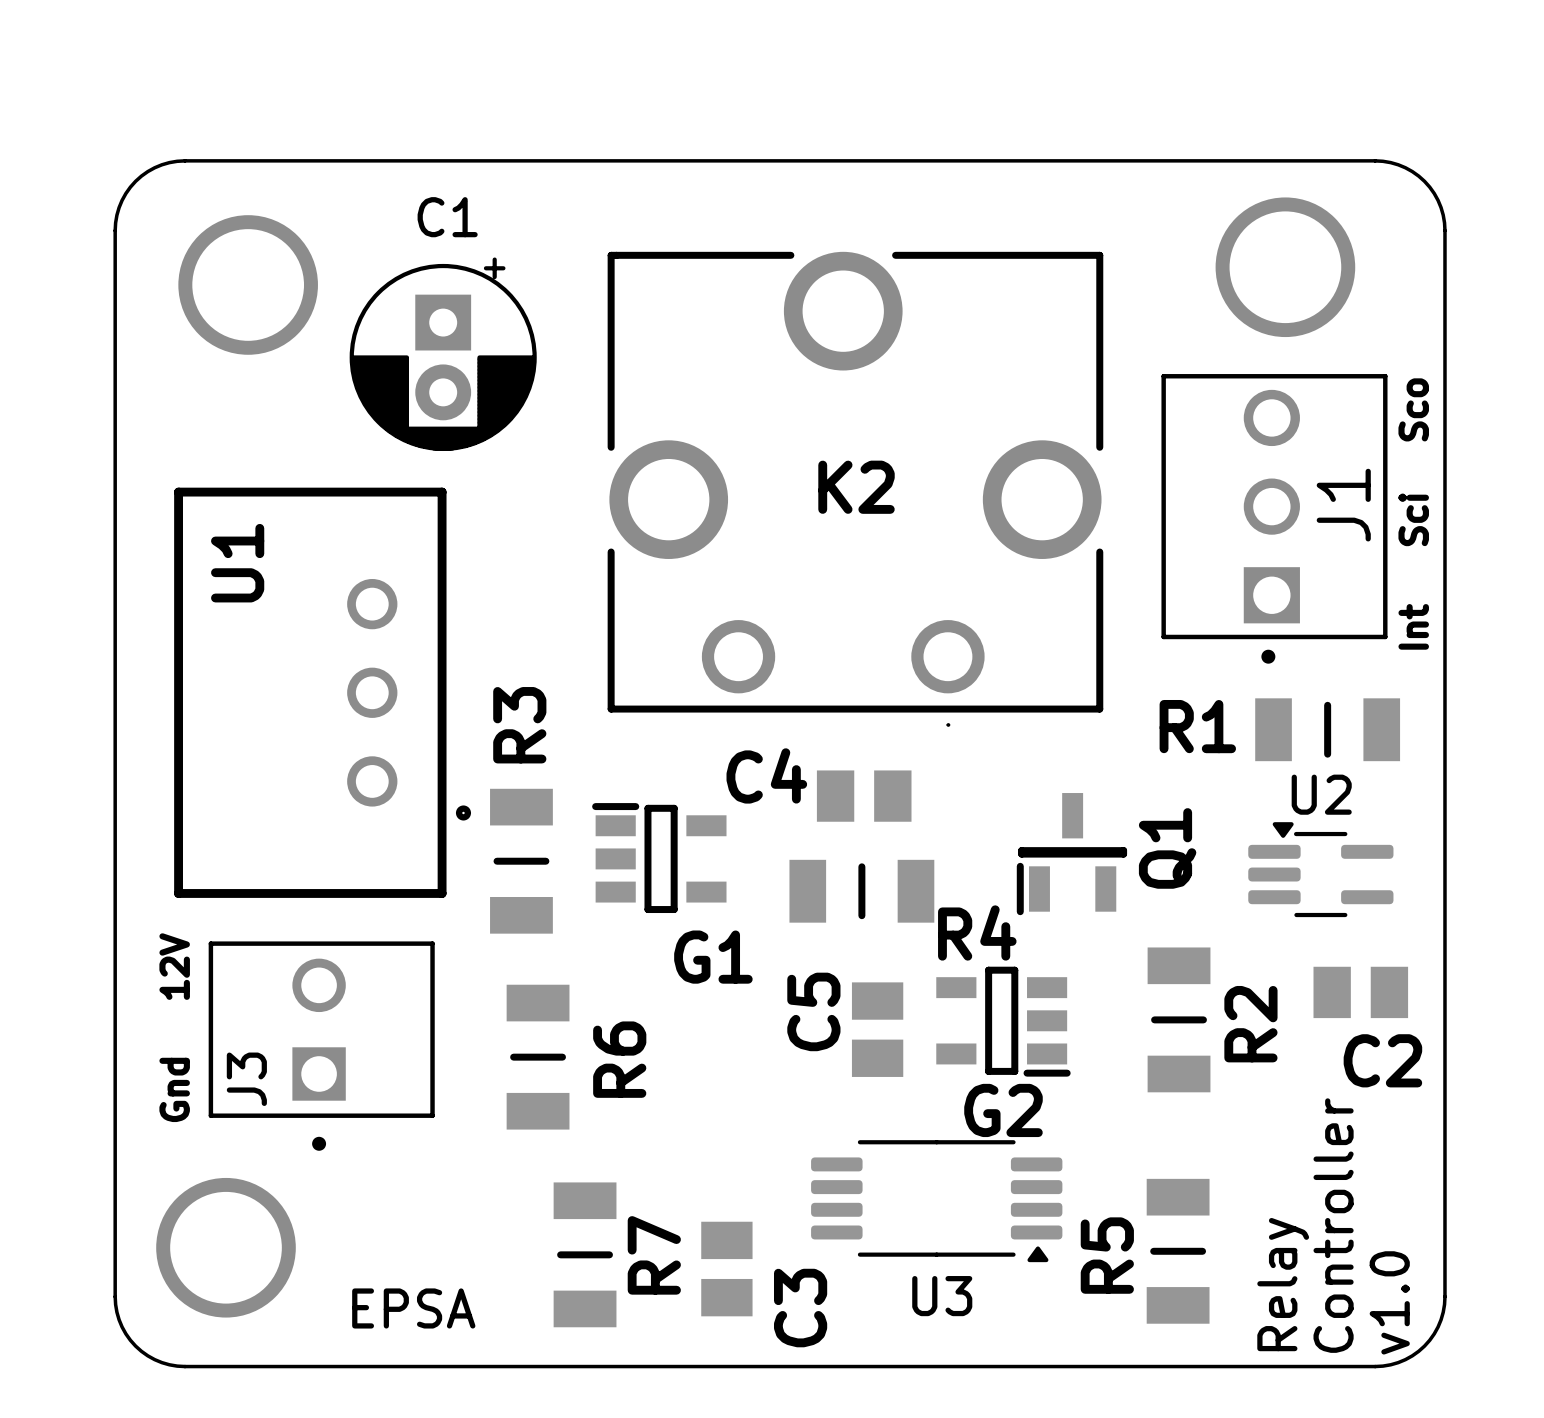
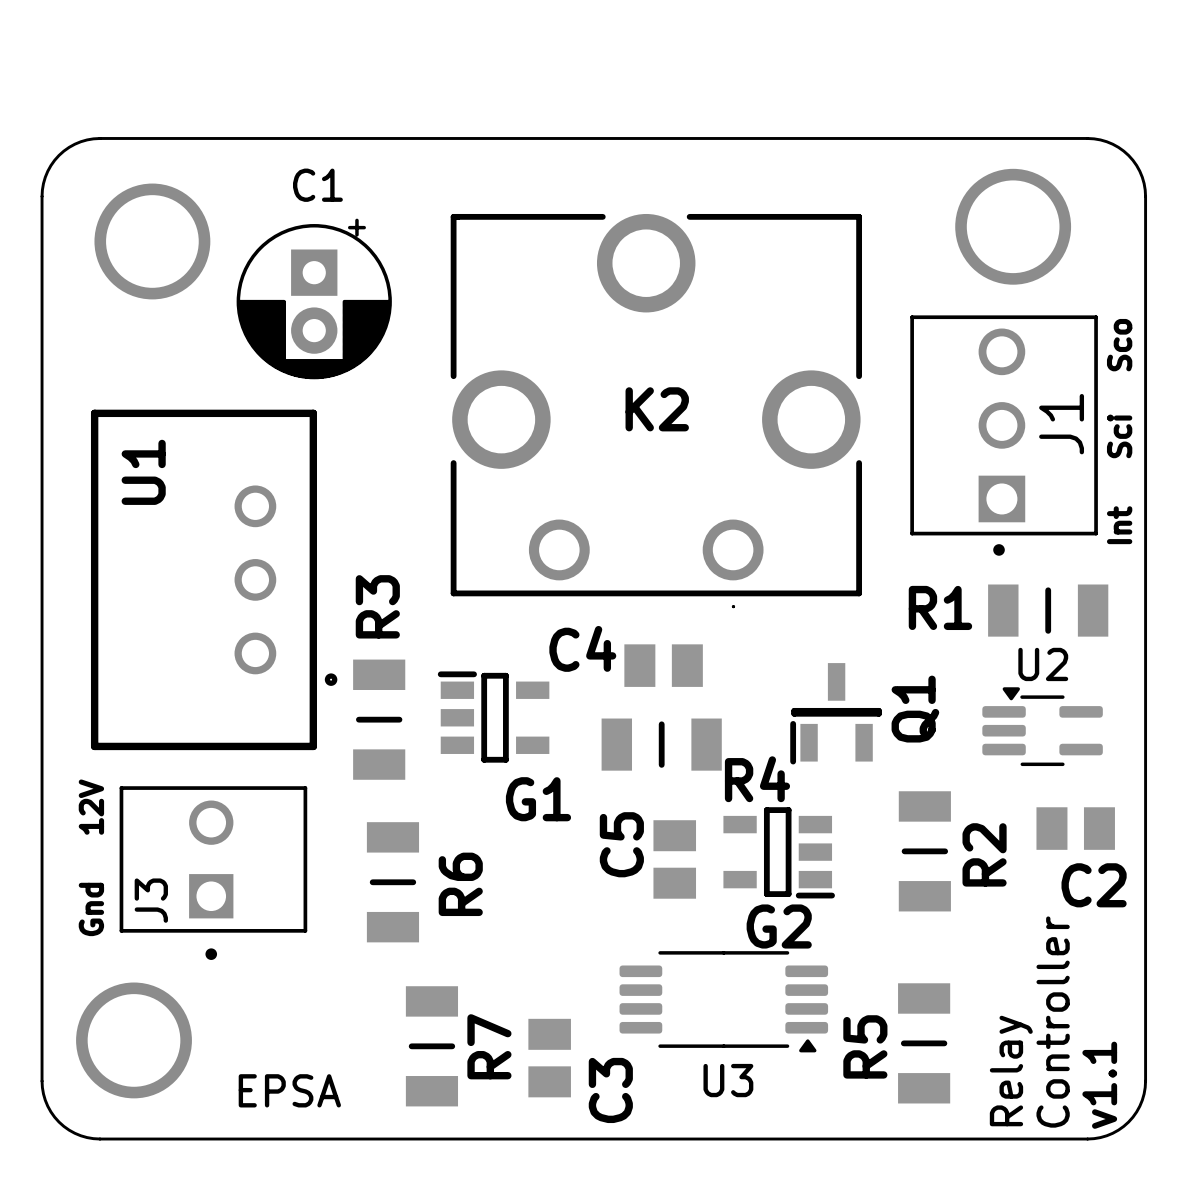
text: v1.0 (1389, 1302) -> v1.1 (1099, 1085)

